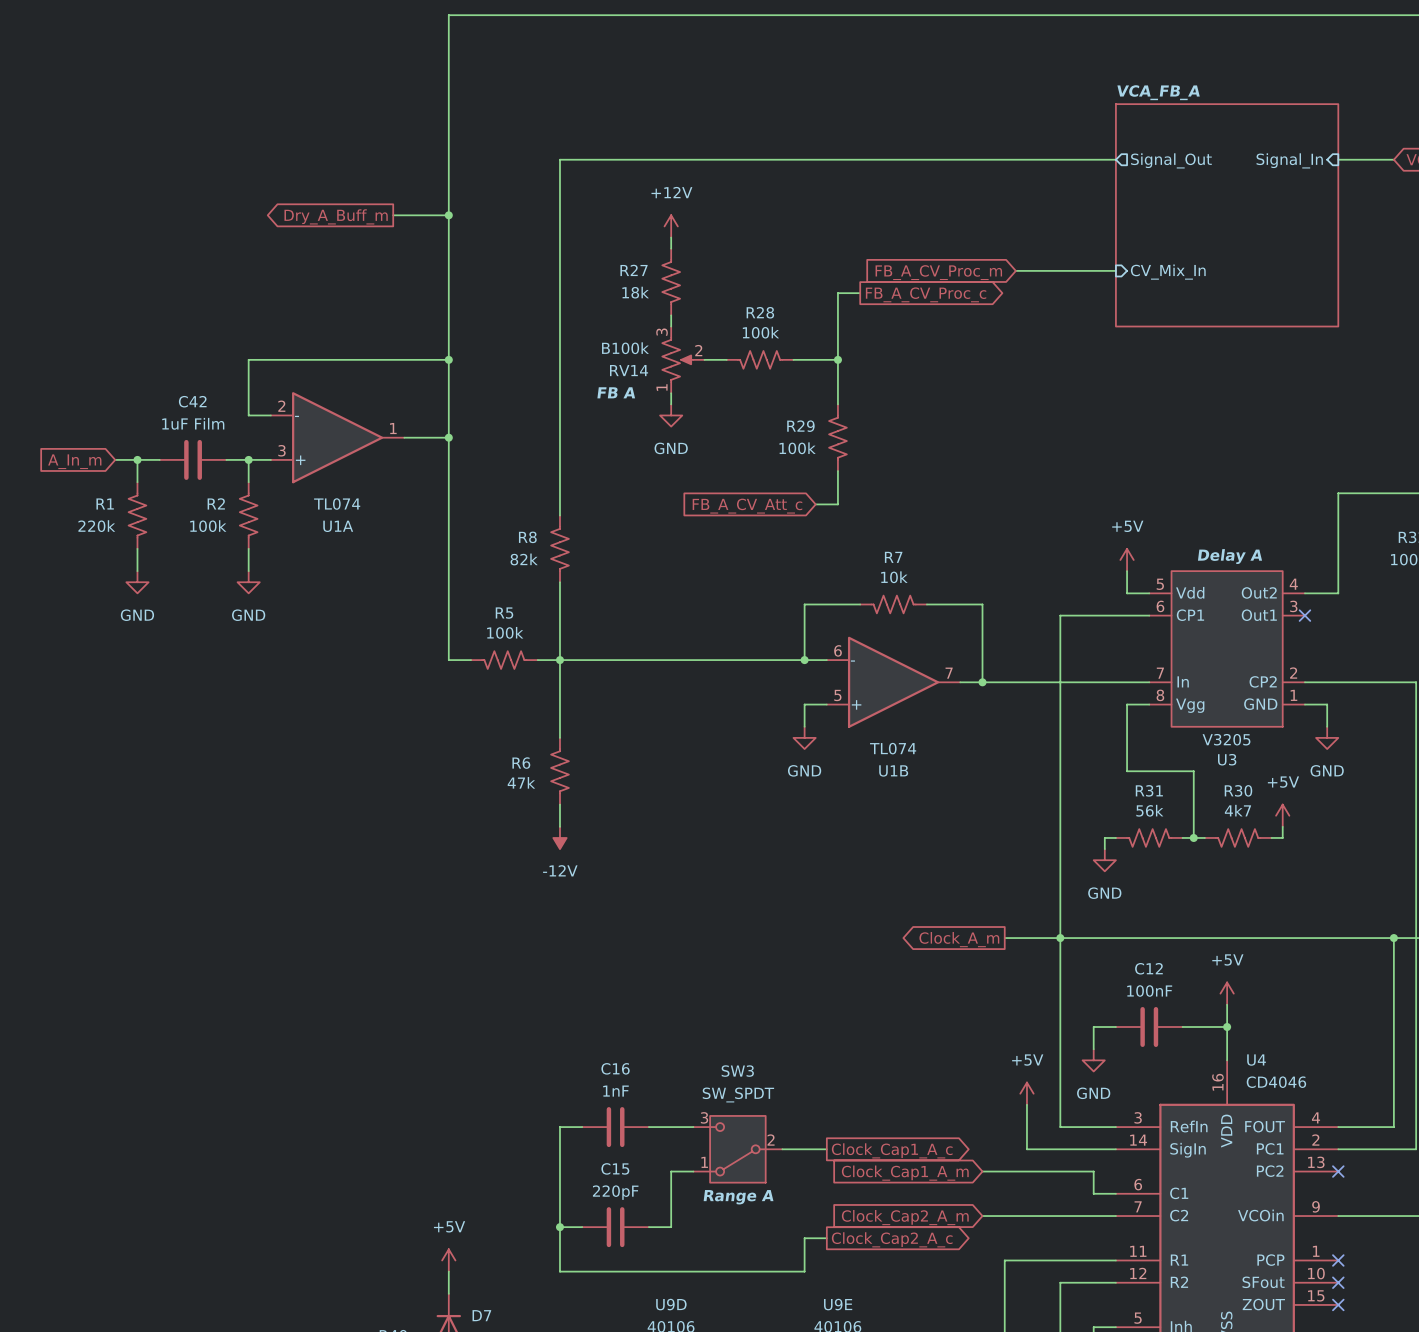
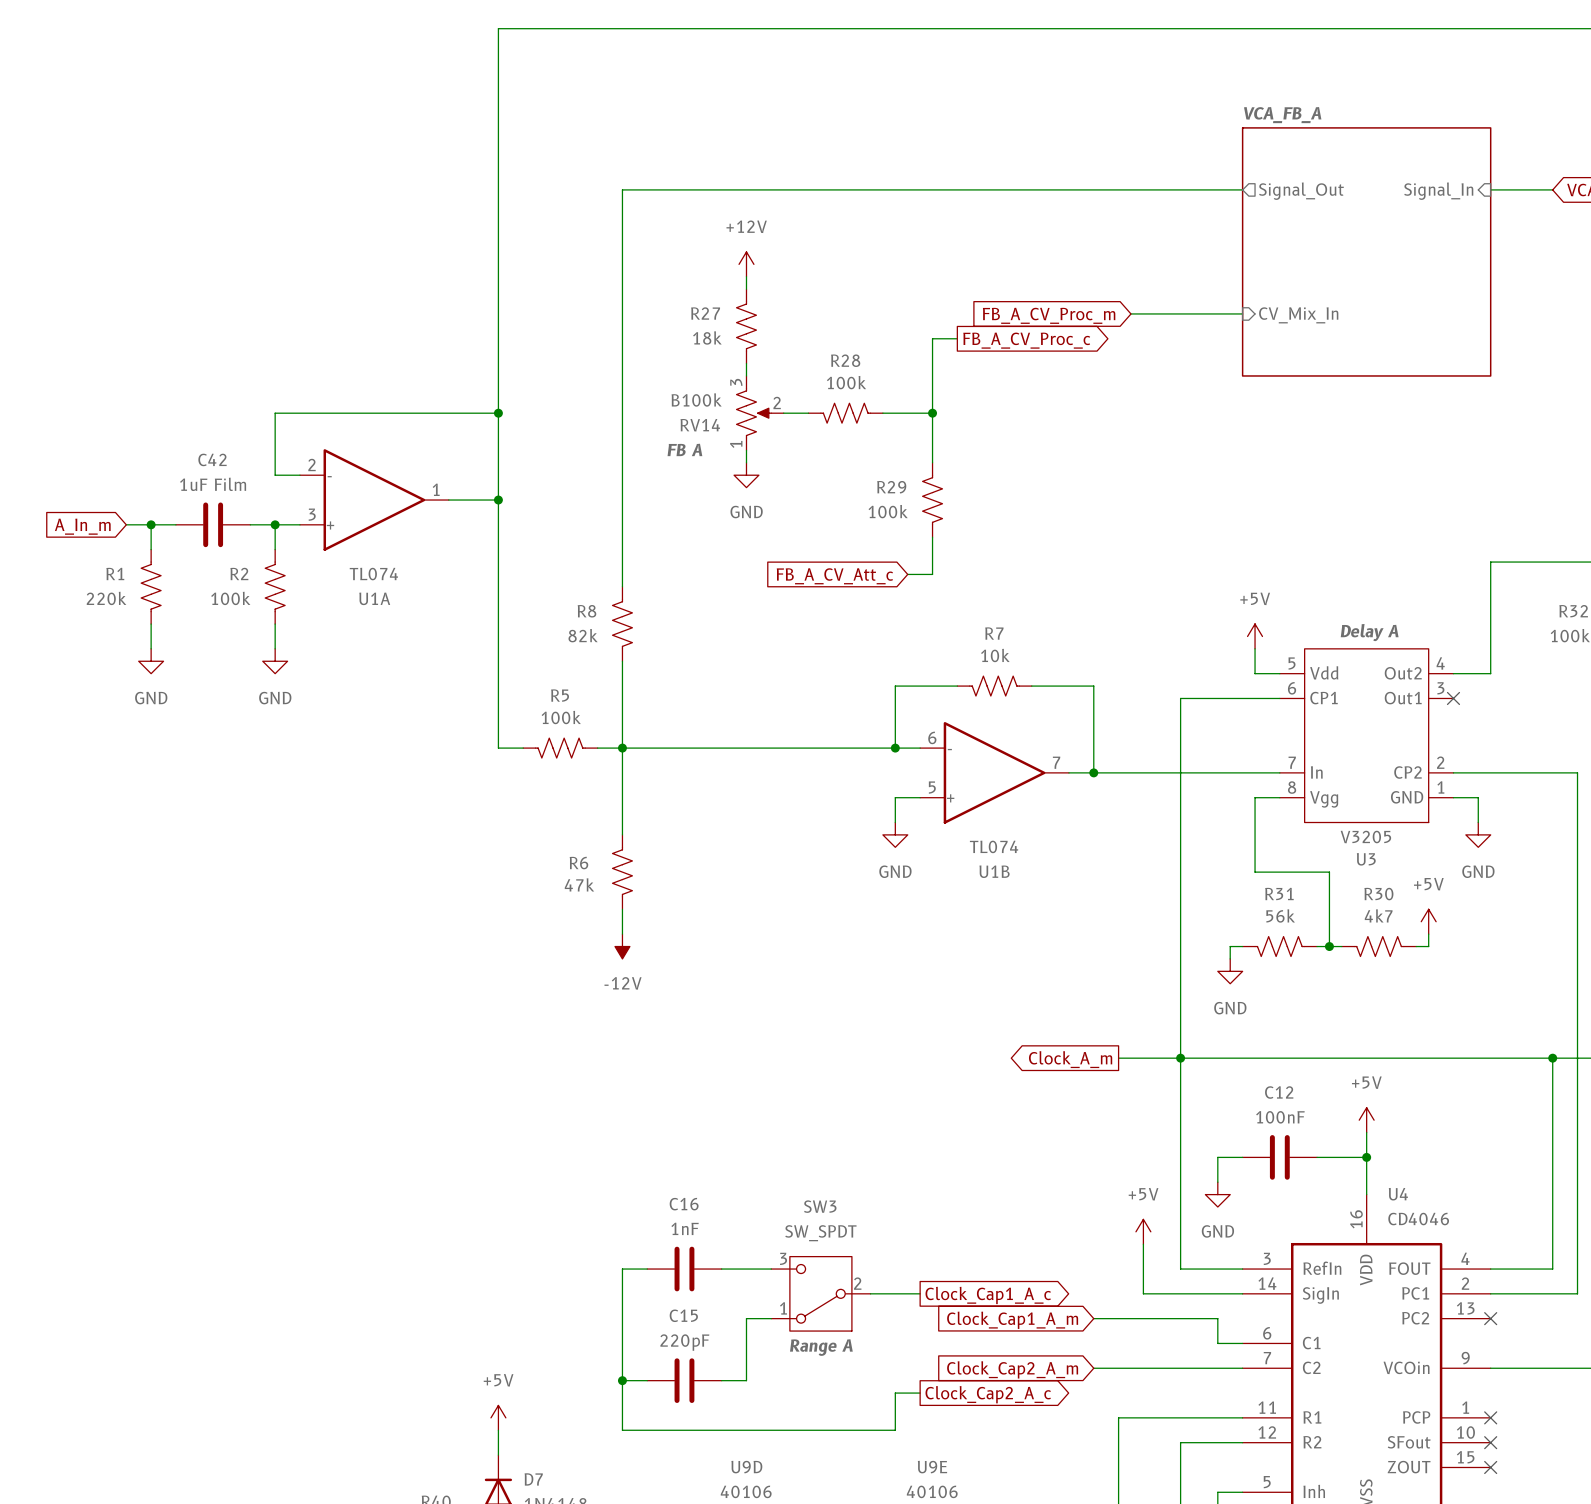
wire: (393, 215) (448, 215) -> none
junction: (448, 215) -> none
global label: Dry_A_Buff_m (336, 216) -> none

